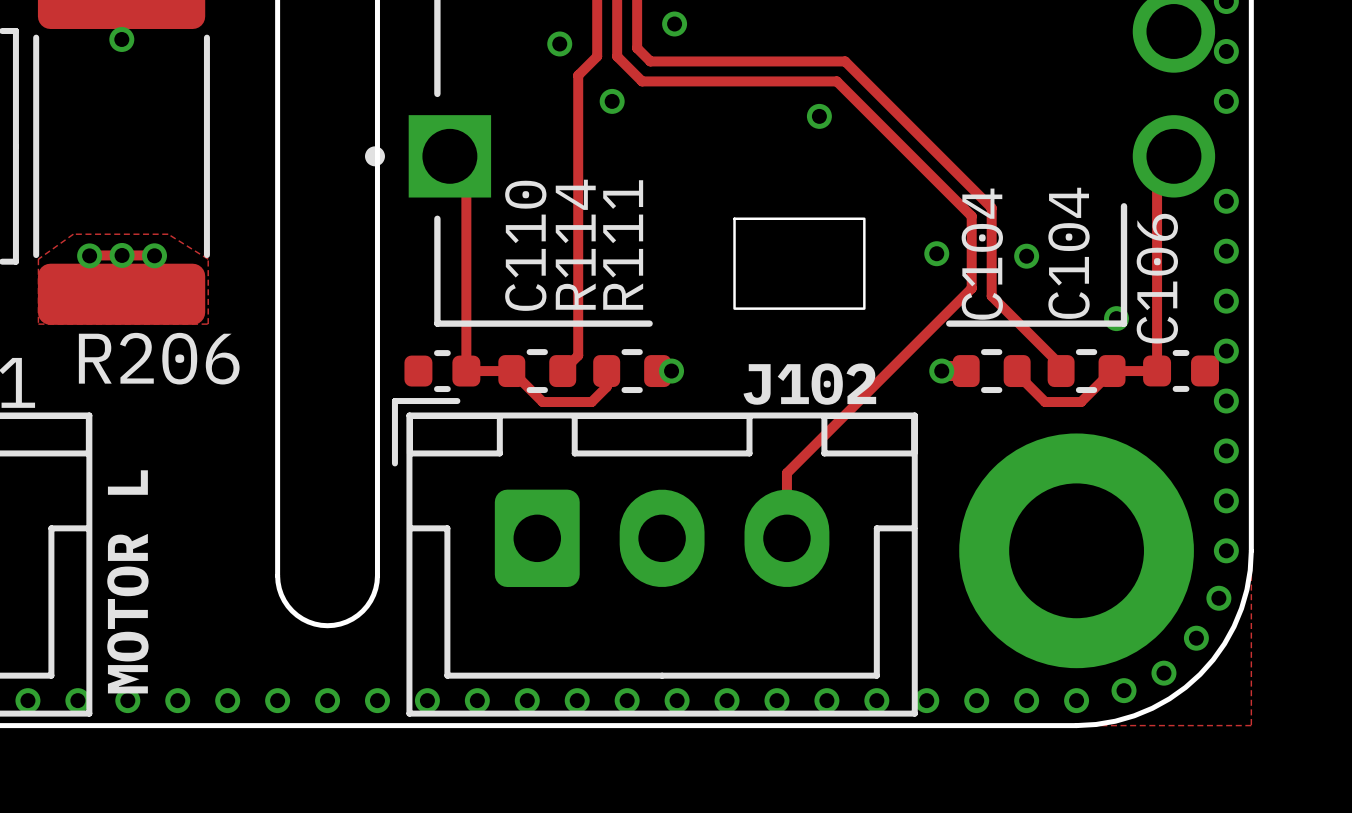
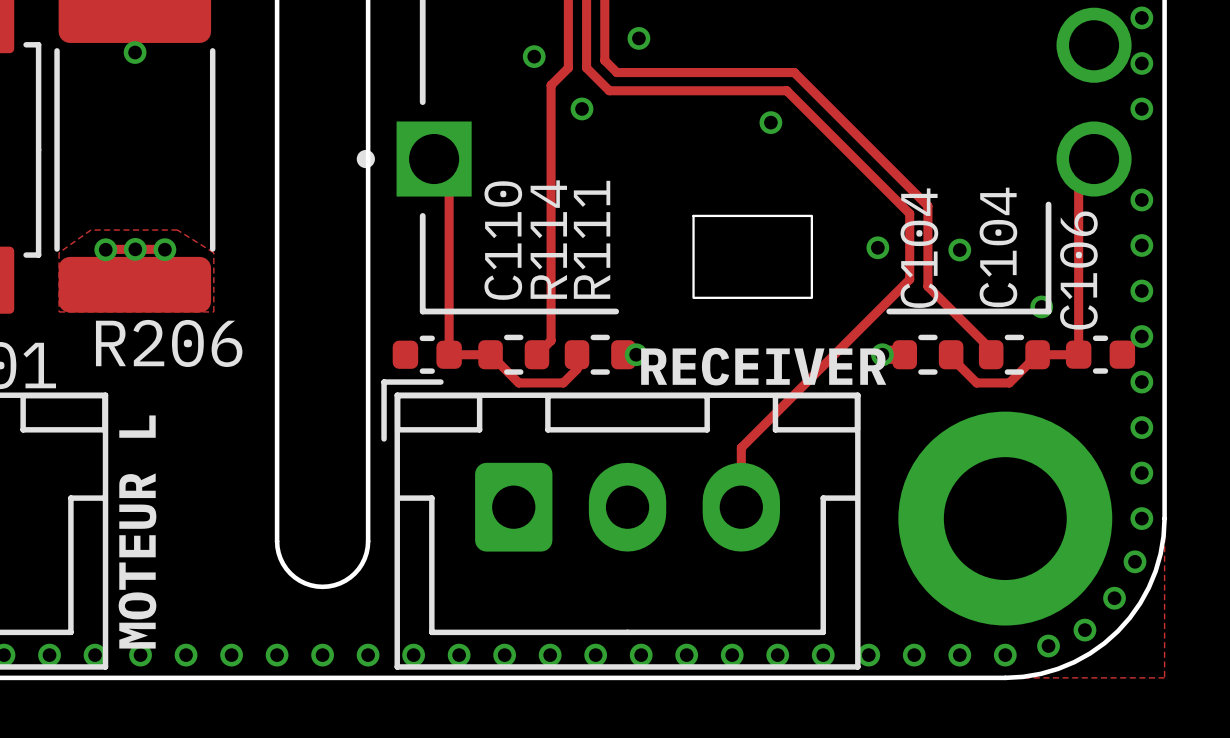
J102 name: J102 (809, 384) -> RECEIVER (763, 366)
text: MOTOR L (127, 581) -> MOTEUR L (137, 532)

